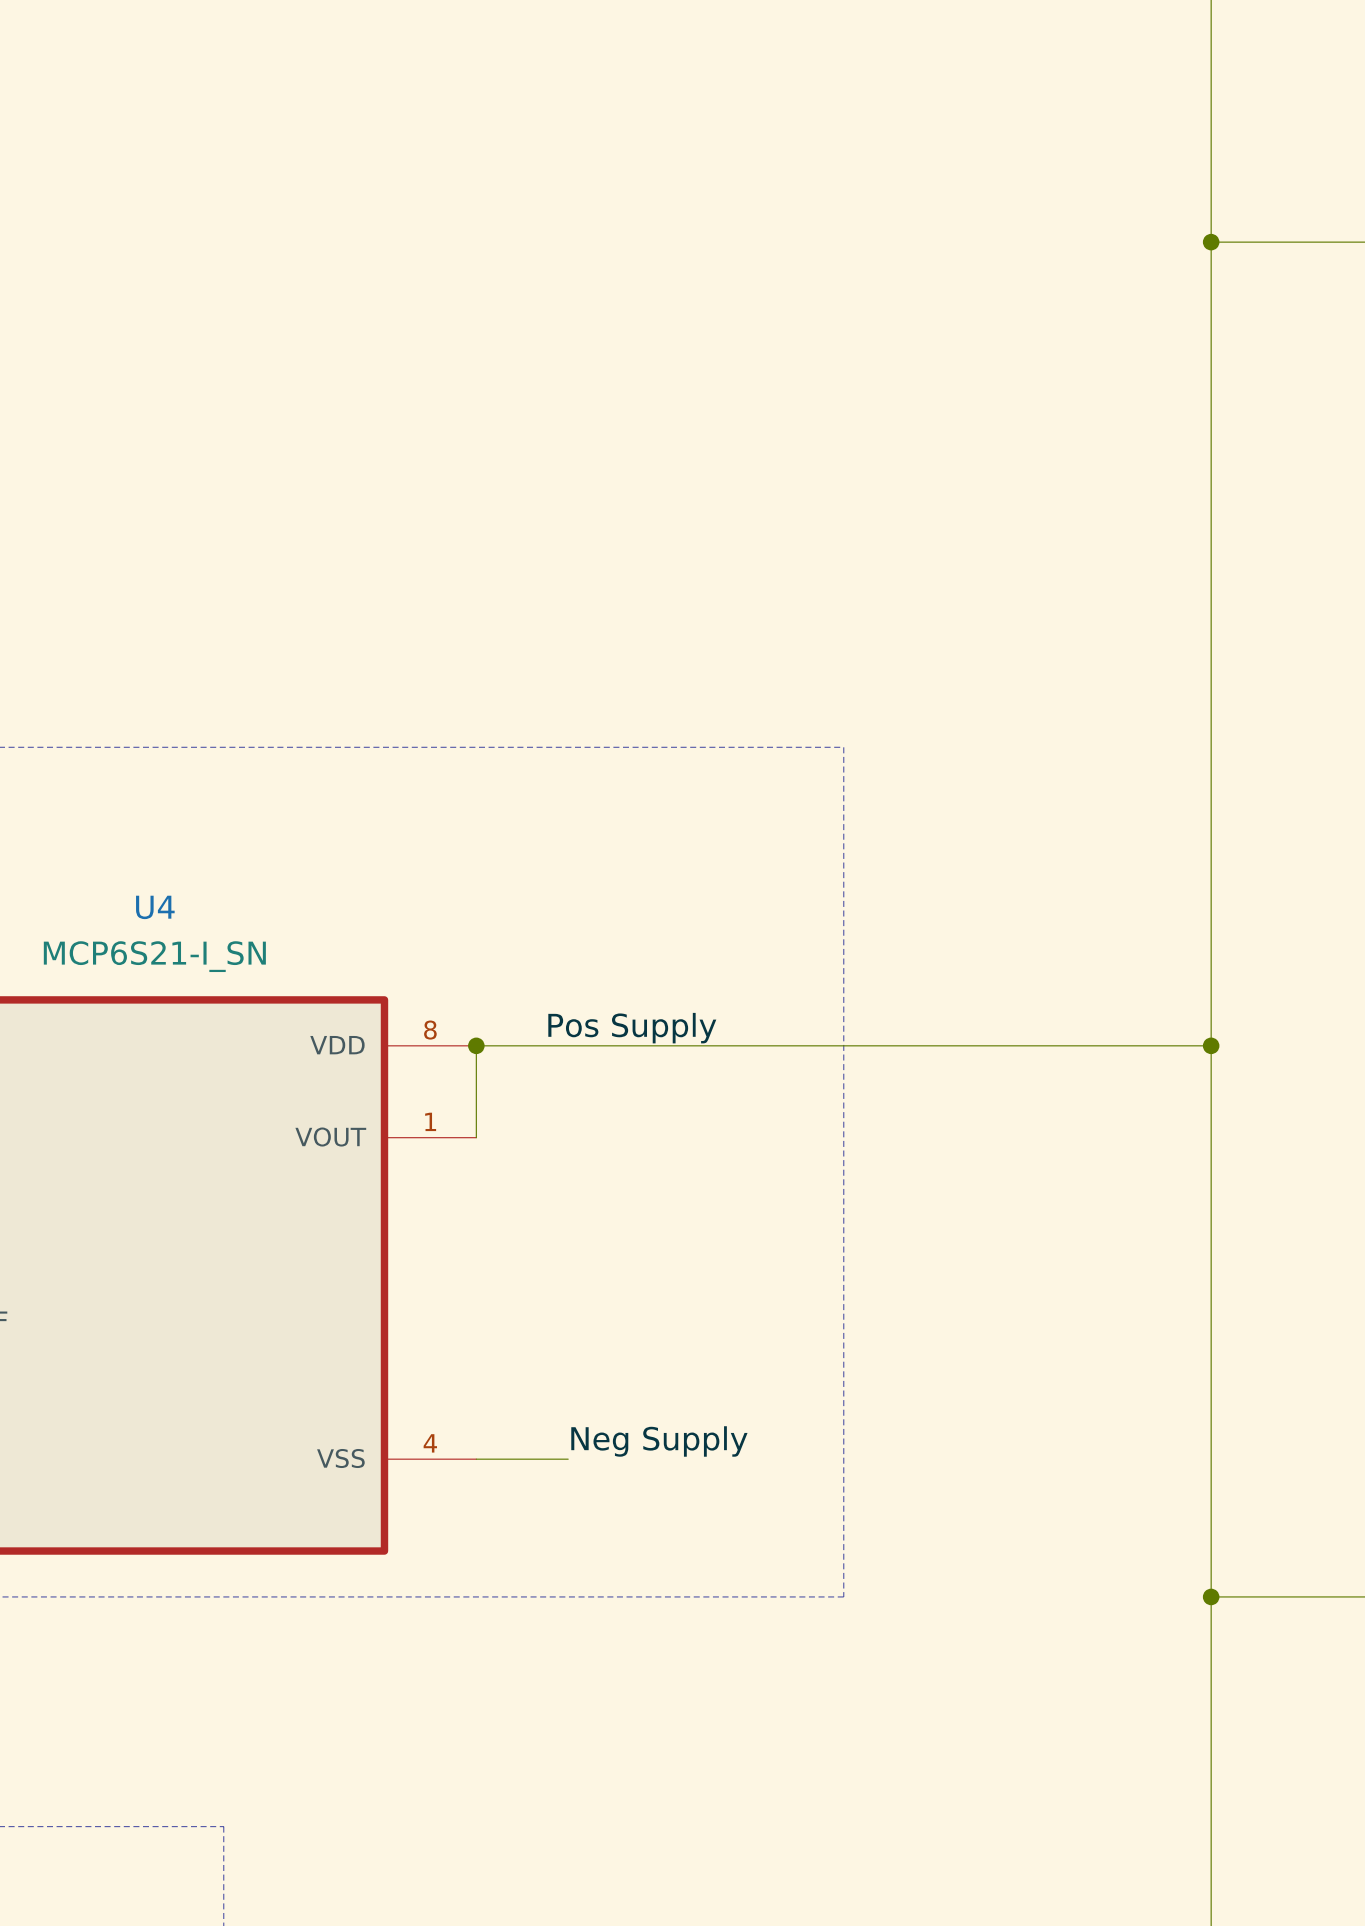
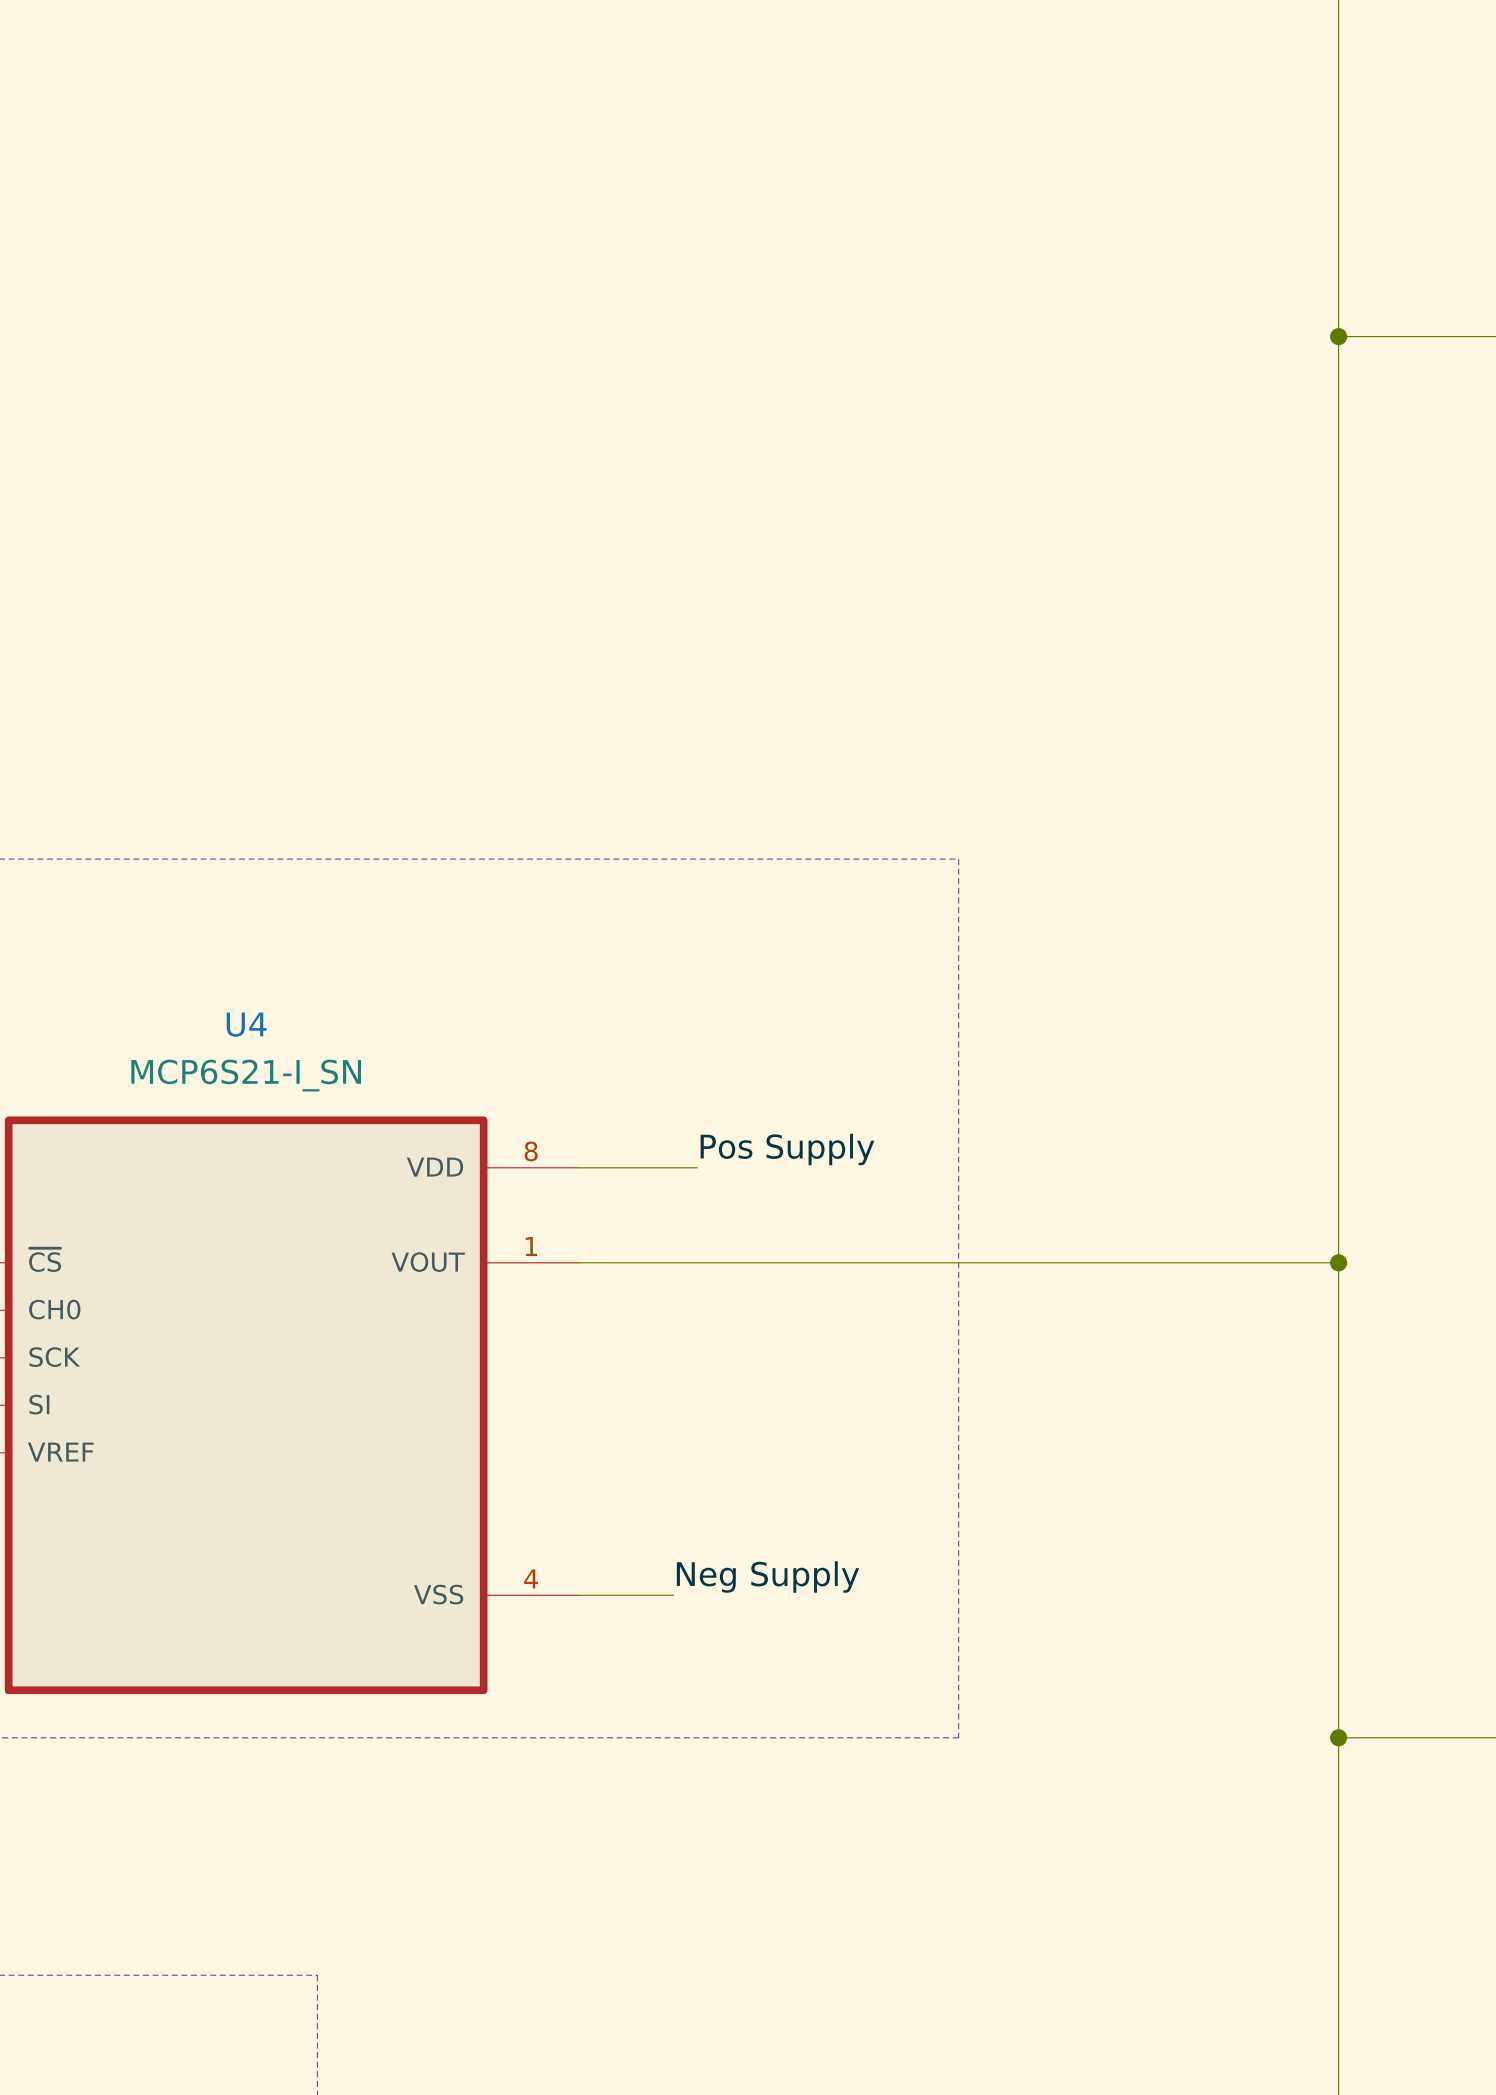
label position: Pos Supply (632, 1028) -> Pos Supply (787, 1149)
wire: (476, 1045) (476, 1137) -> (1338, 1262) (578, 1262)
junction: (476, 1045) -> none
wire: (591, 1045) (1211, 1045) -> none
junction position: (1211, 1045) -> (1338, 1262)

